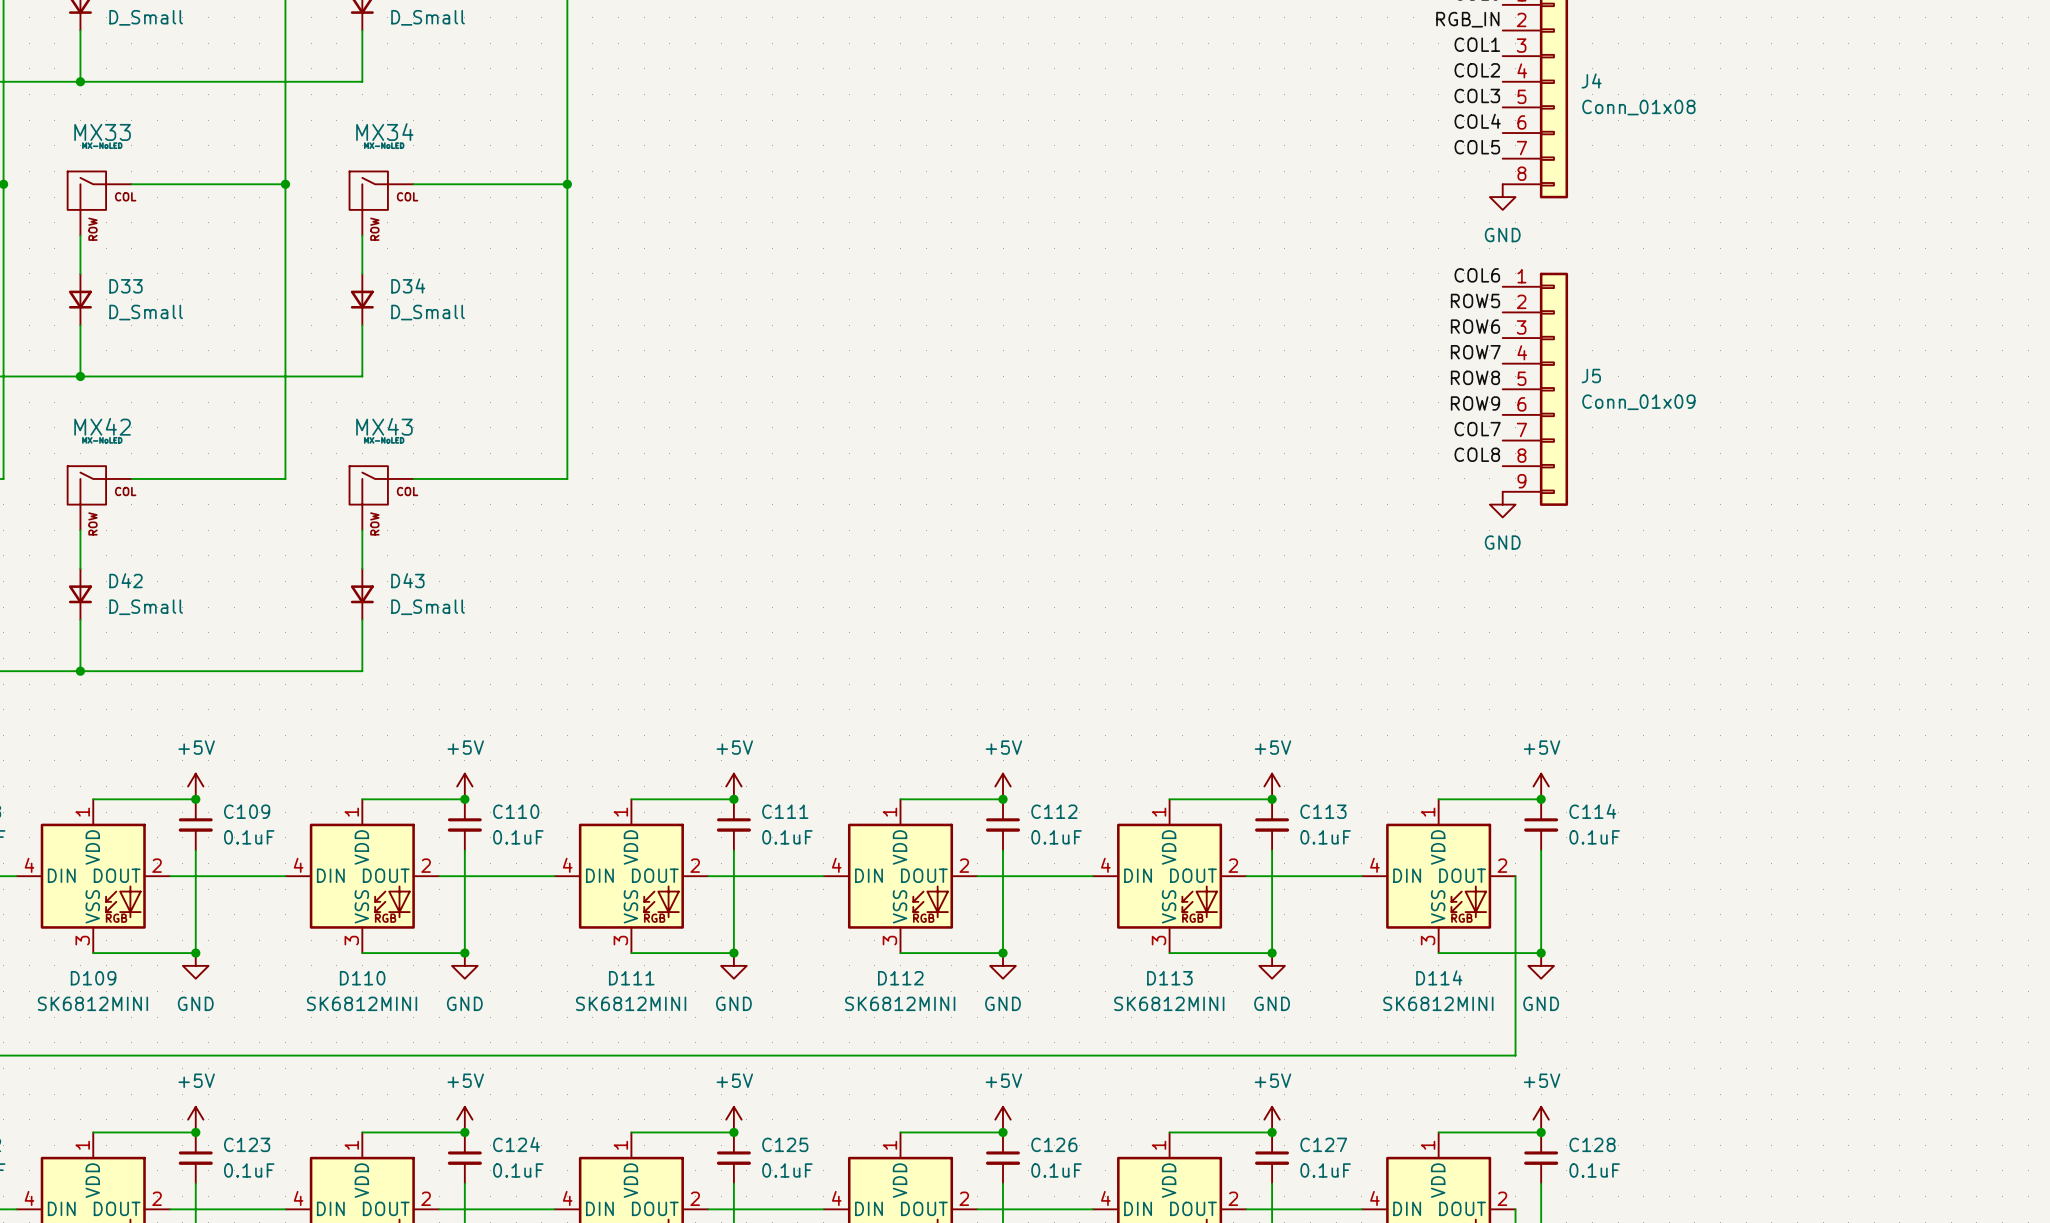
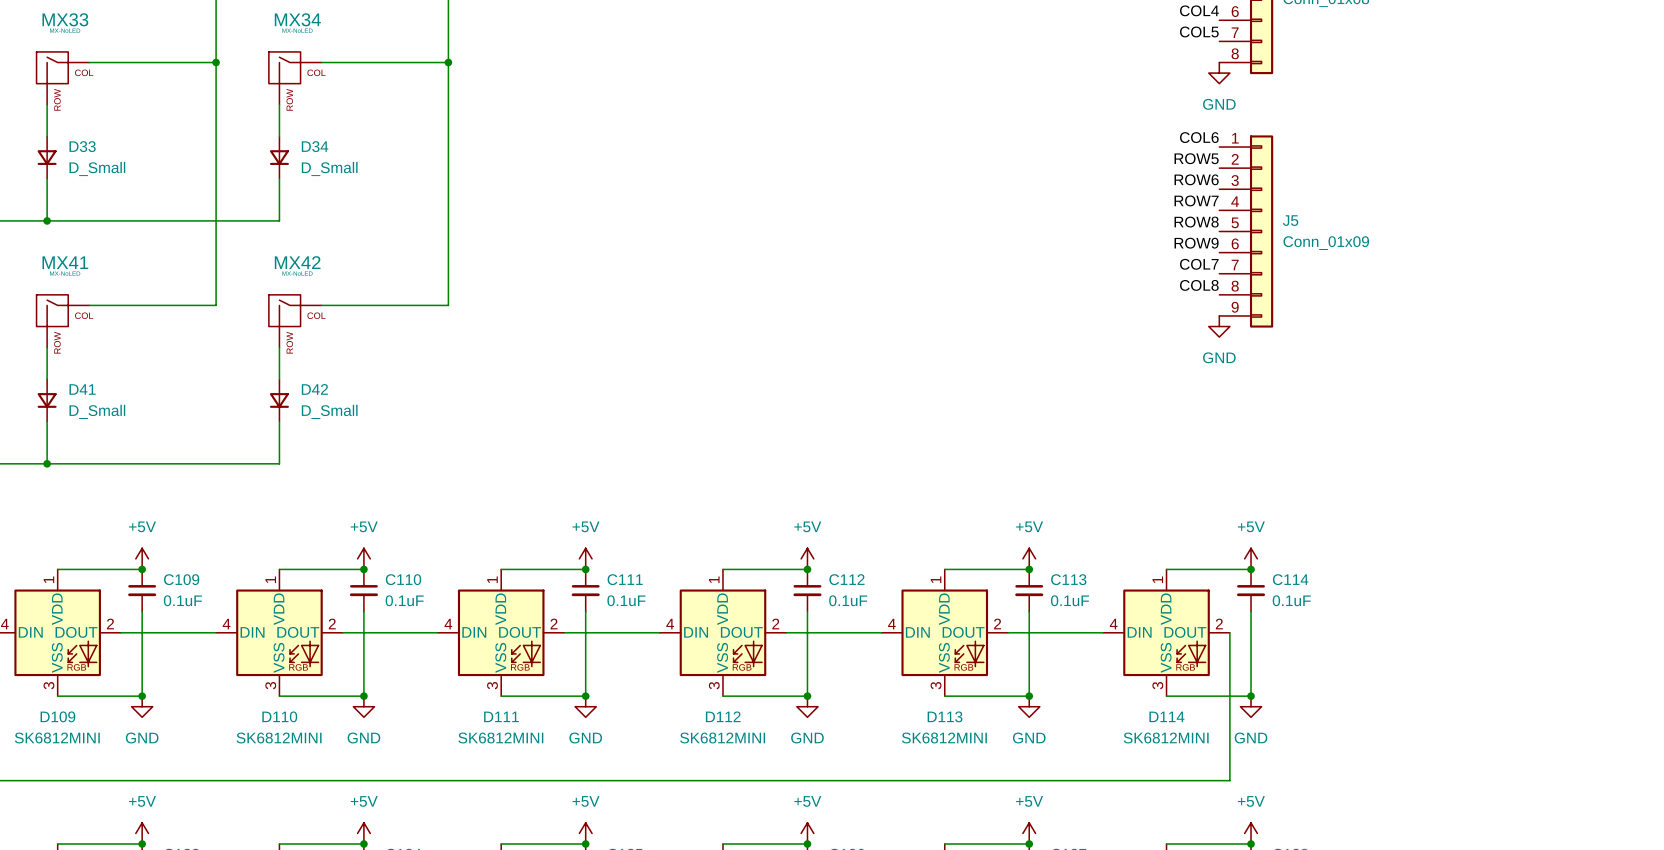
MX42 name: MX42 (102, 426) -> MX41 (65, 262)
MX43 name: MX43 (384, 426) -> MX42 (297, 262)
D42 name: D42 (125, 580) -> D41 (82, 389)
D43 name: D43 (407, 580) -> D42 (314, 389)

